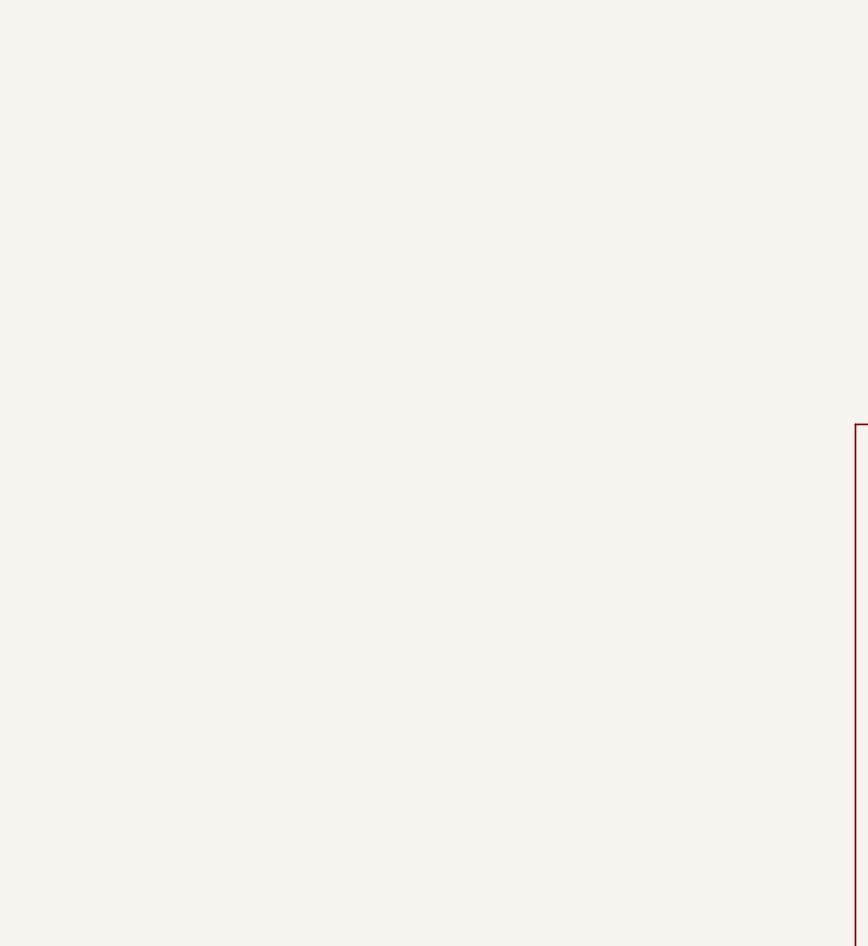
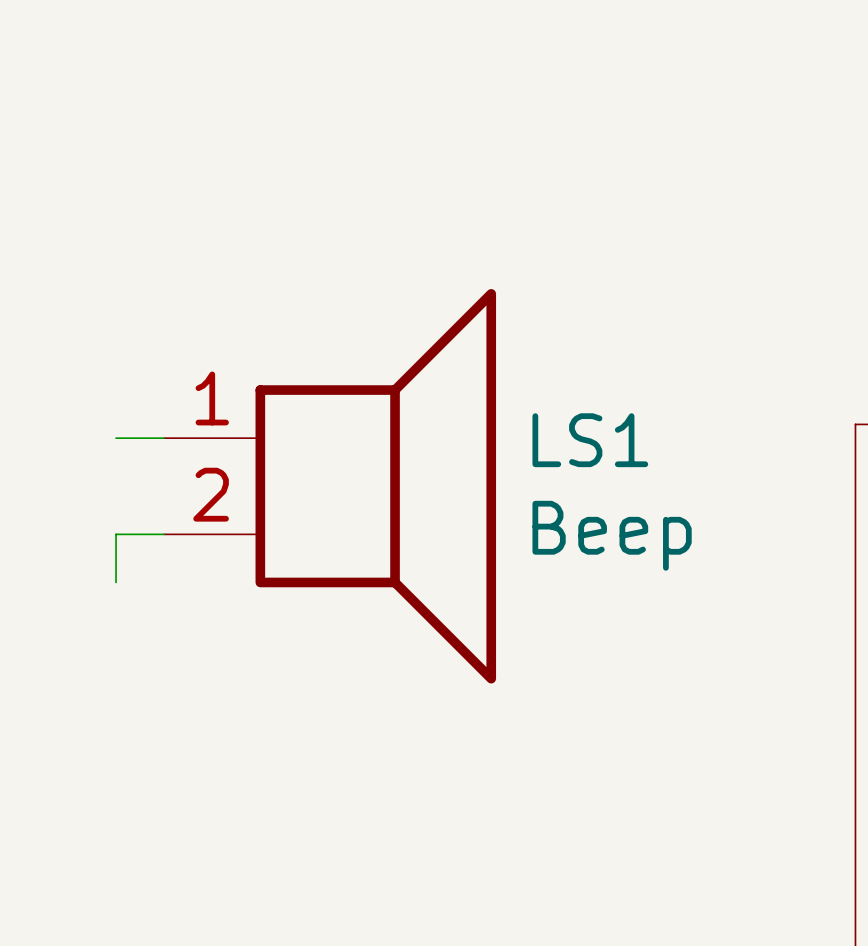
wire: none -> (116, 438) (164, 438)
LS1: none -> Beep (330, 486)
wire: none -> (164, 534) (116, 534) (116, 582)

